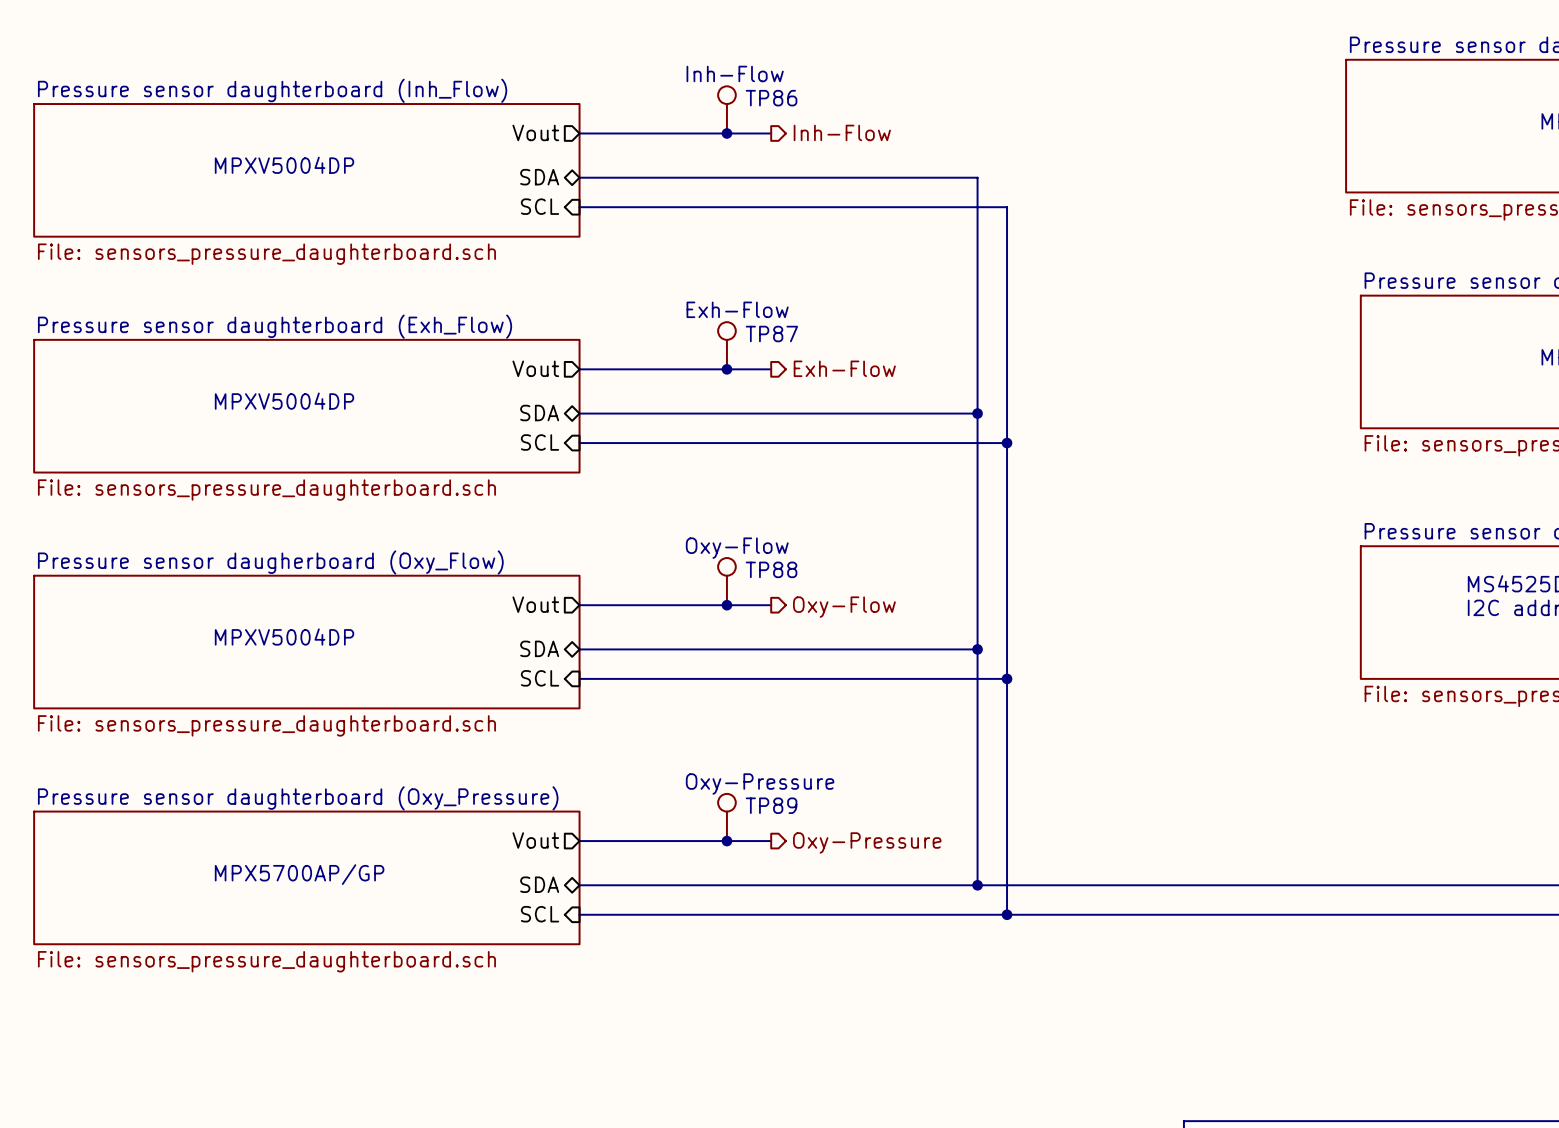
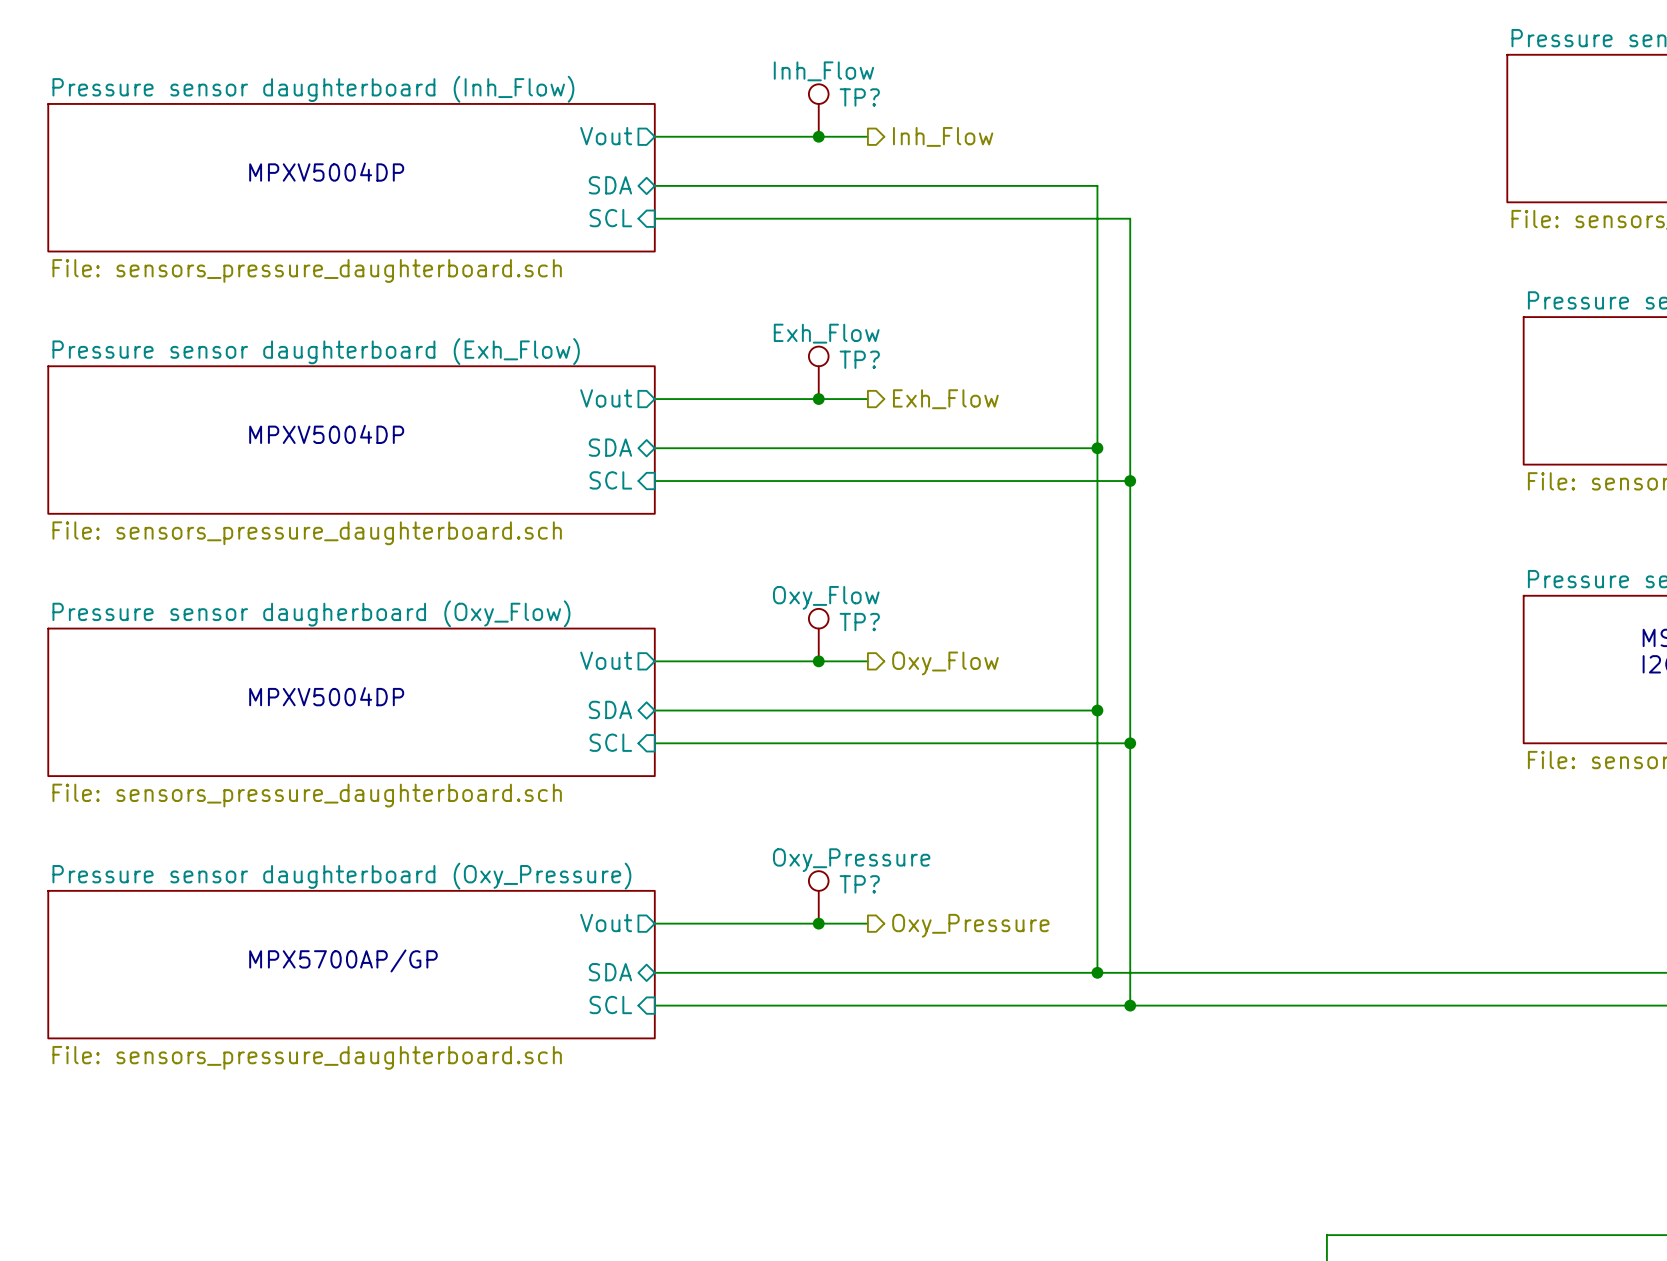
TP86 value: Inh-Flow (735, 73) -> Inh_Flow (823, 71)
TP86 name: TP86 (771, 98) -> TP? (859, 97)
hierarchical label: Inh-Flow (842, 132) -> Inh_Flow (943, 136)
TP87 value: Exh-Flow (737, 309) -> Exh_Flow (826, 333)
TP87 name: TP87 (771, 334) -> TP? (859, 359)
hierarchical label: Exh-Flow (844, 368) -> Exh_Flow (945, 399)
TP88 value: Oxy-Flow (737, 548) -> Oxy_Flow (826, 597)
TP88 name: TP88 (771, 569) -> TP? (859, 622)
hierarchical label: Oxy-Flow (844, 607) -> Oxy_Flow (945, 663)
TP89 value: Oxy-Pressure (760, 784) -> Oxy_Pressure (851, 860)
TP89 name: TP89 (771, 805) -> TP? (859, 884)
hierarchical label: Oxy-Pressure (867, 842) -> Oxy_Pressure (970, 925)

